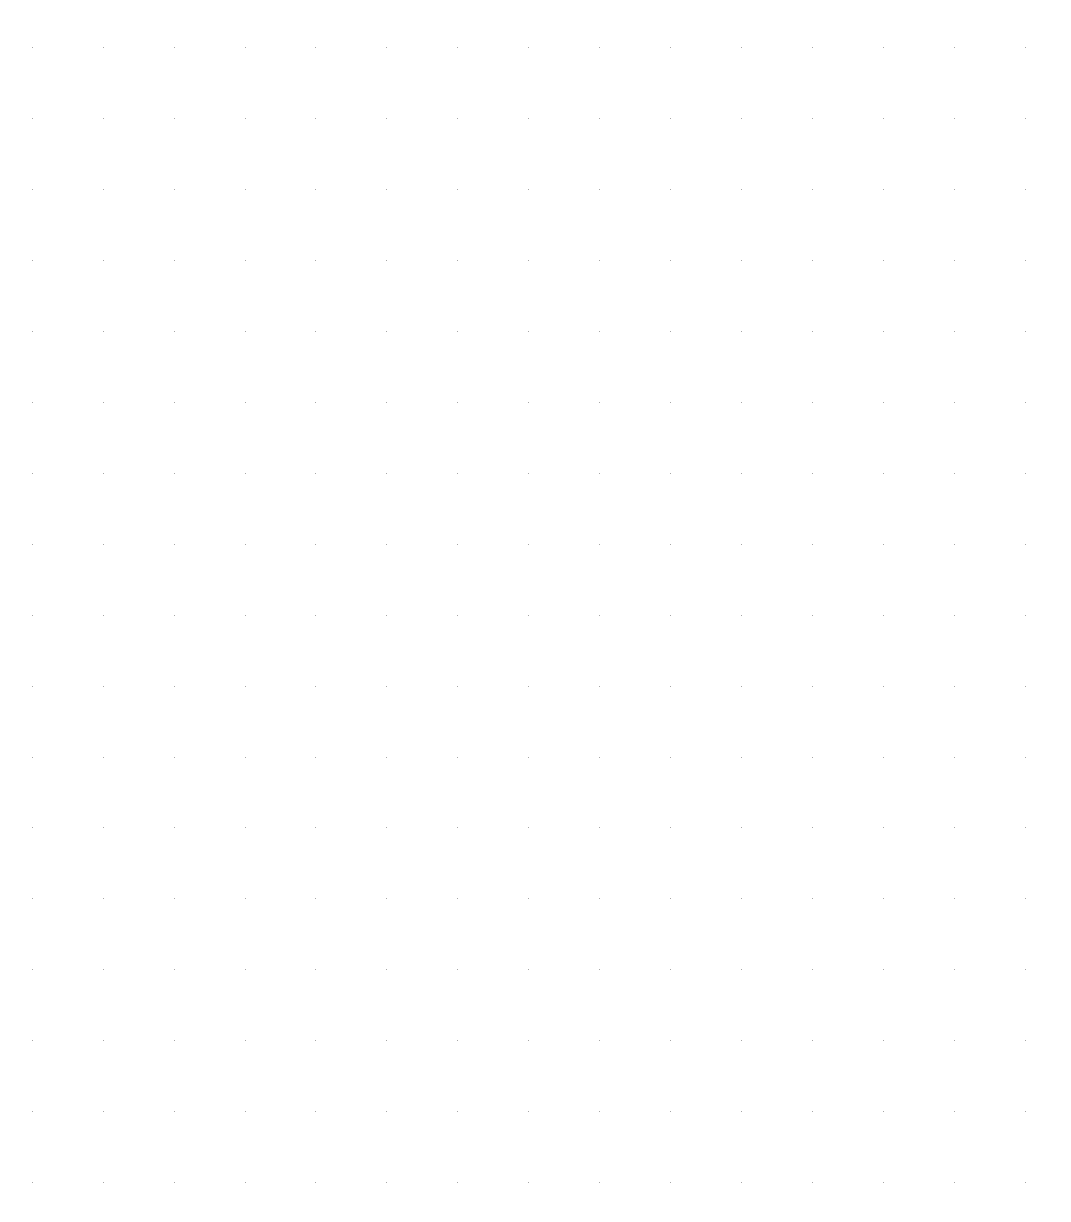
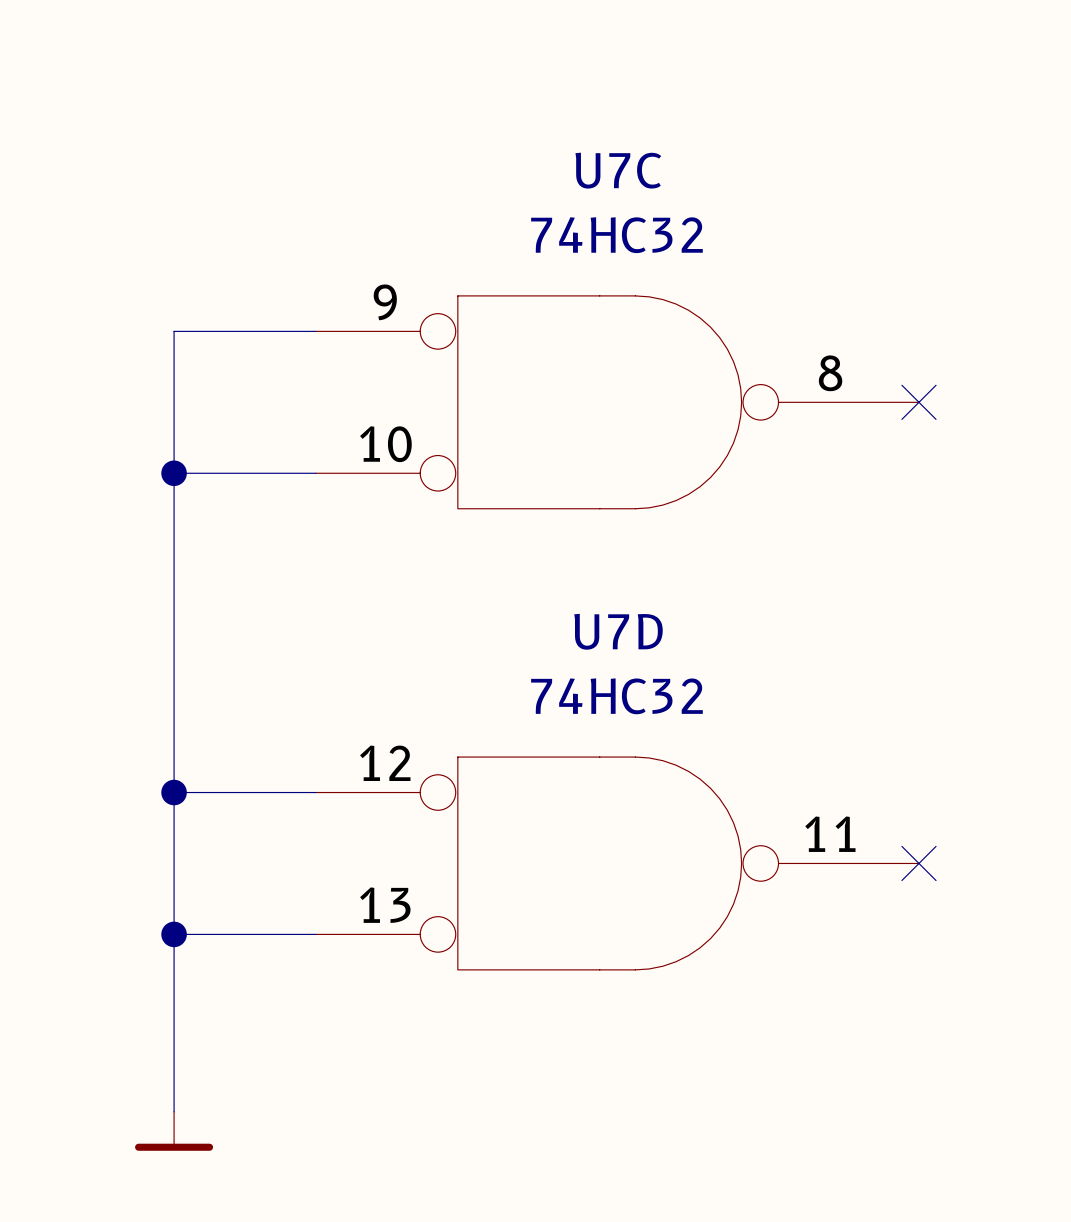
wire: none -> (315, 331) (174, 331) (174, 1111)
U7C: none -> 74HC32 (617, 402)
no-connect mark: none -> (918, 402)
wire: none -> (174, 473) (315, 473)
junction: none -> (174, 473)
wire: none -> (174, 792) (315, 792)
junction: none -> (174, 792)
U7D: none -> 74HC32 (617, 863)
no-connect mark: none -> (918, 863)
wire: none -> (174, 934) (315, 934)
junction: none -> (174, 934)
power symbol: none -> (174, 1131)

